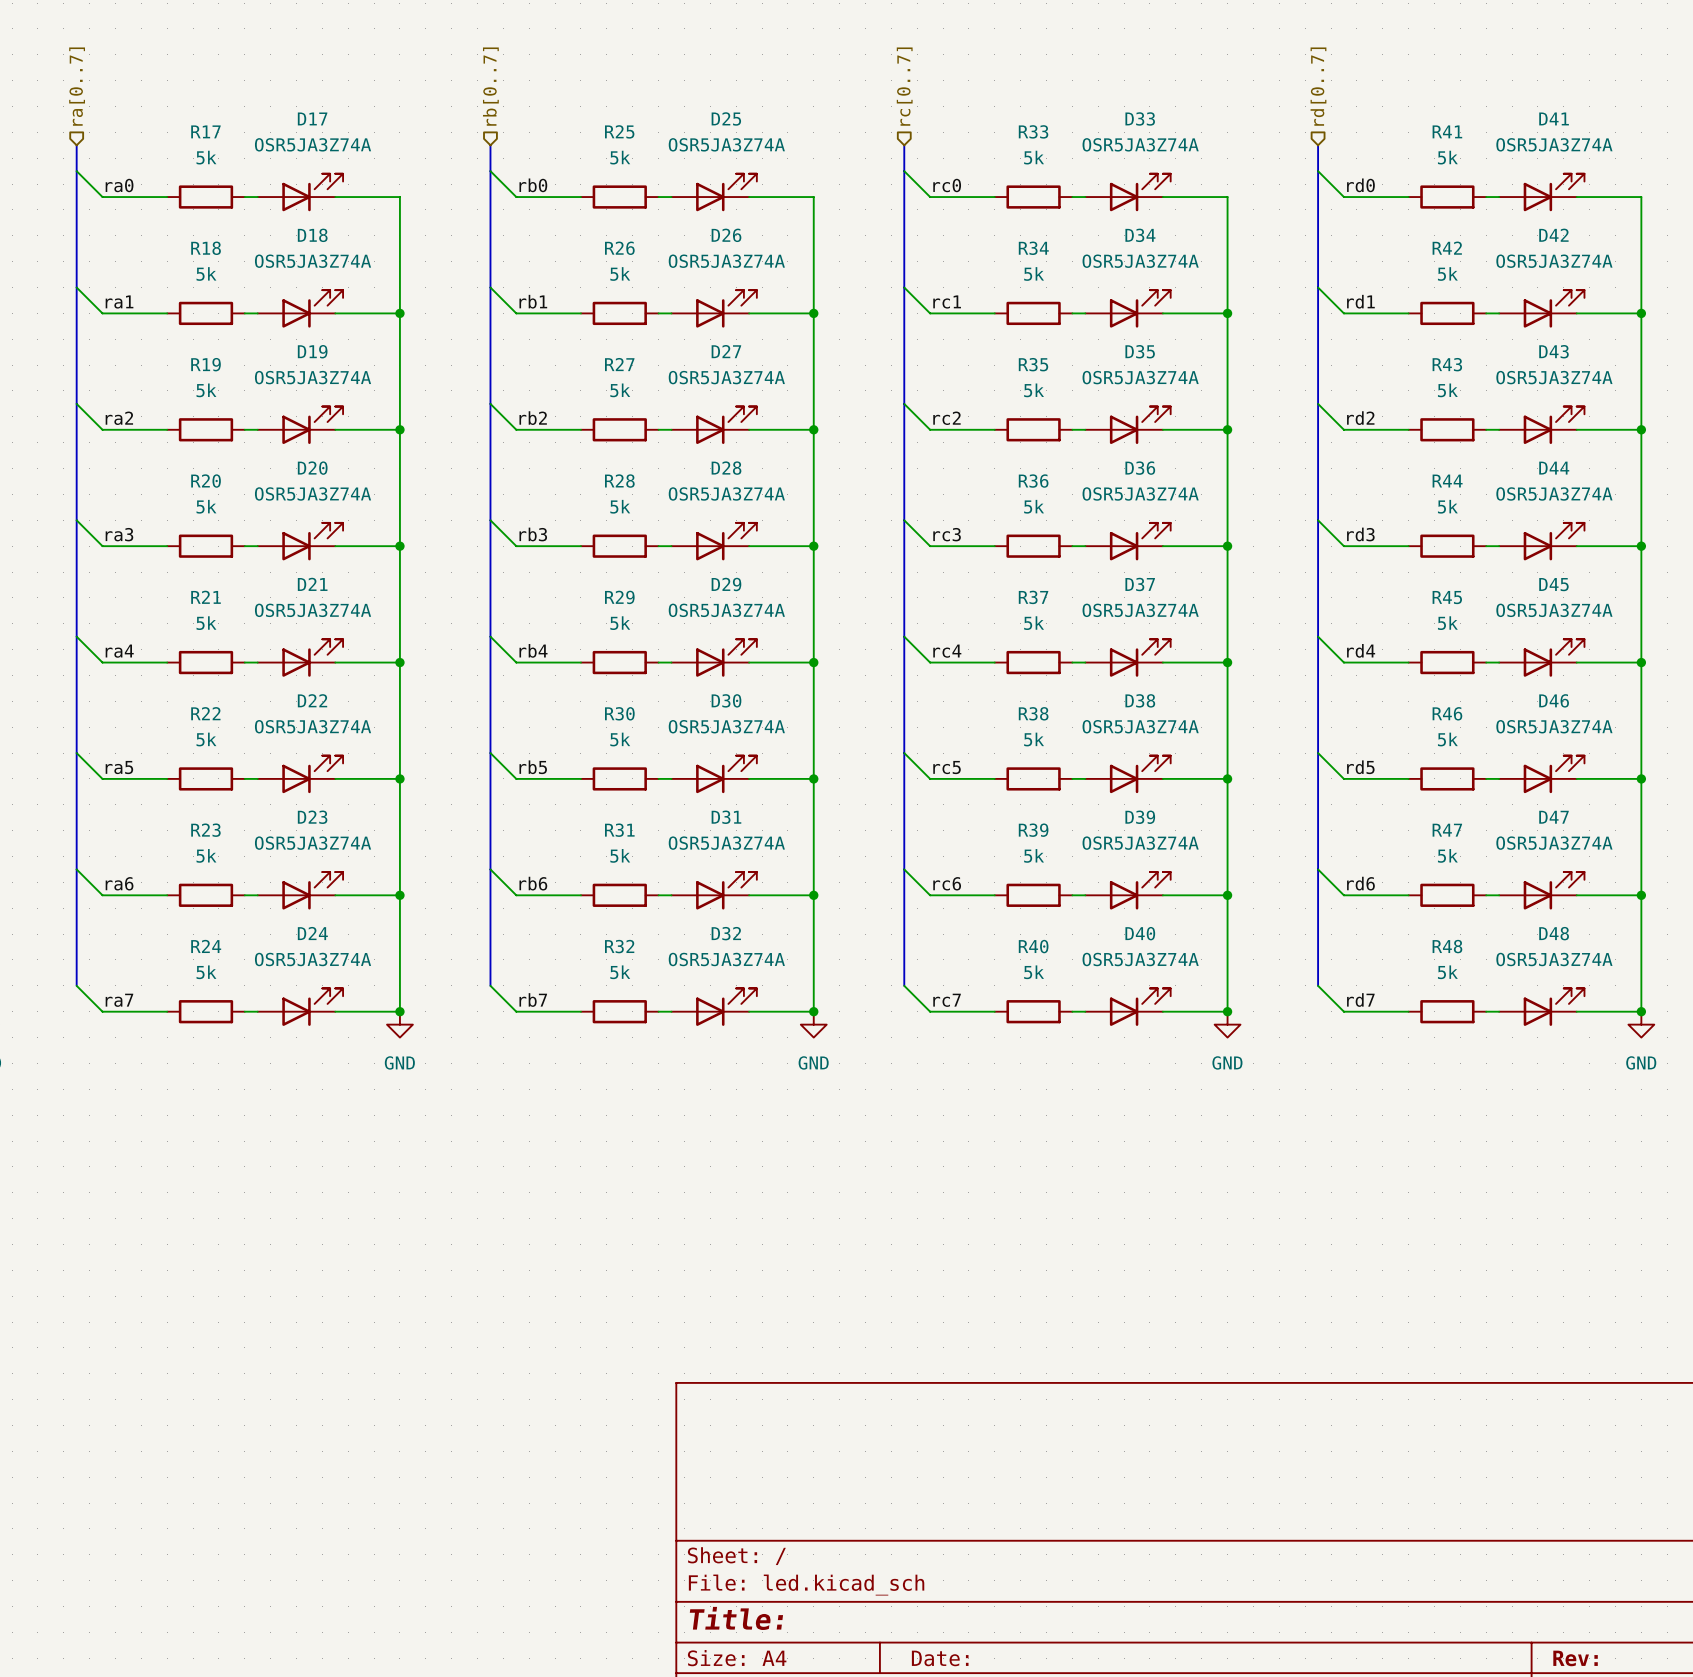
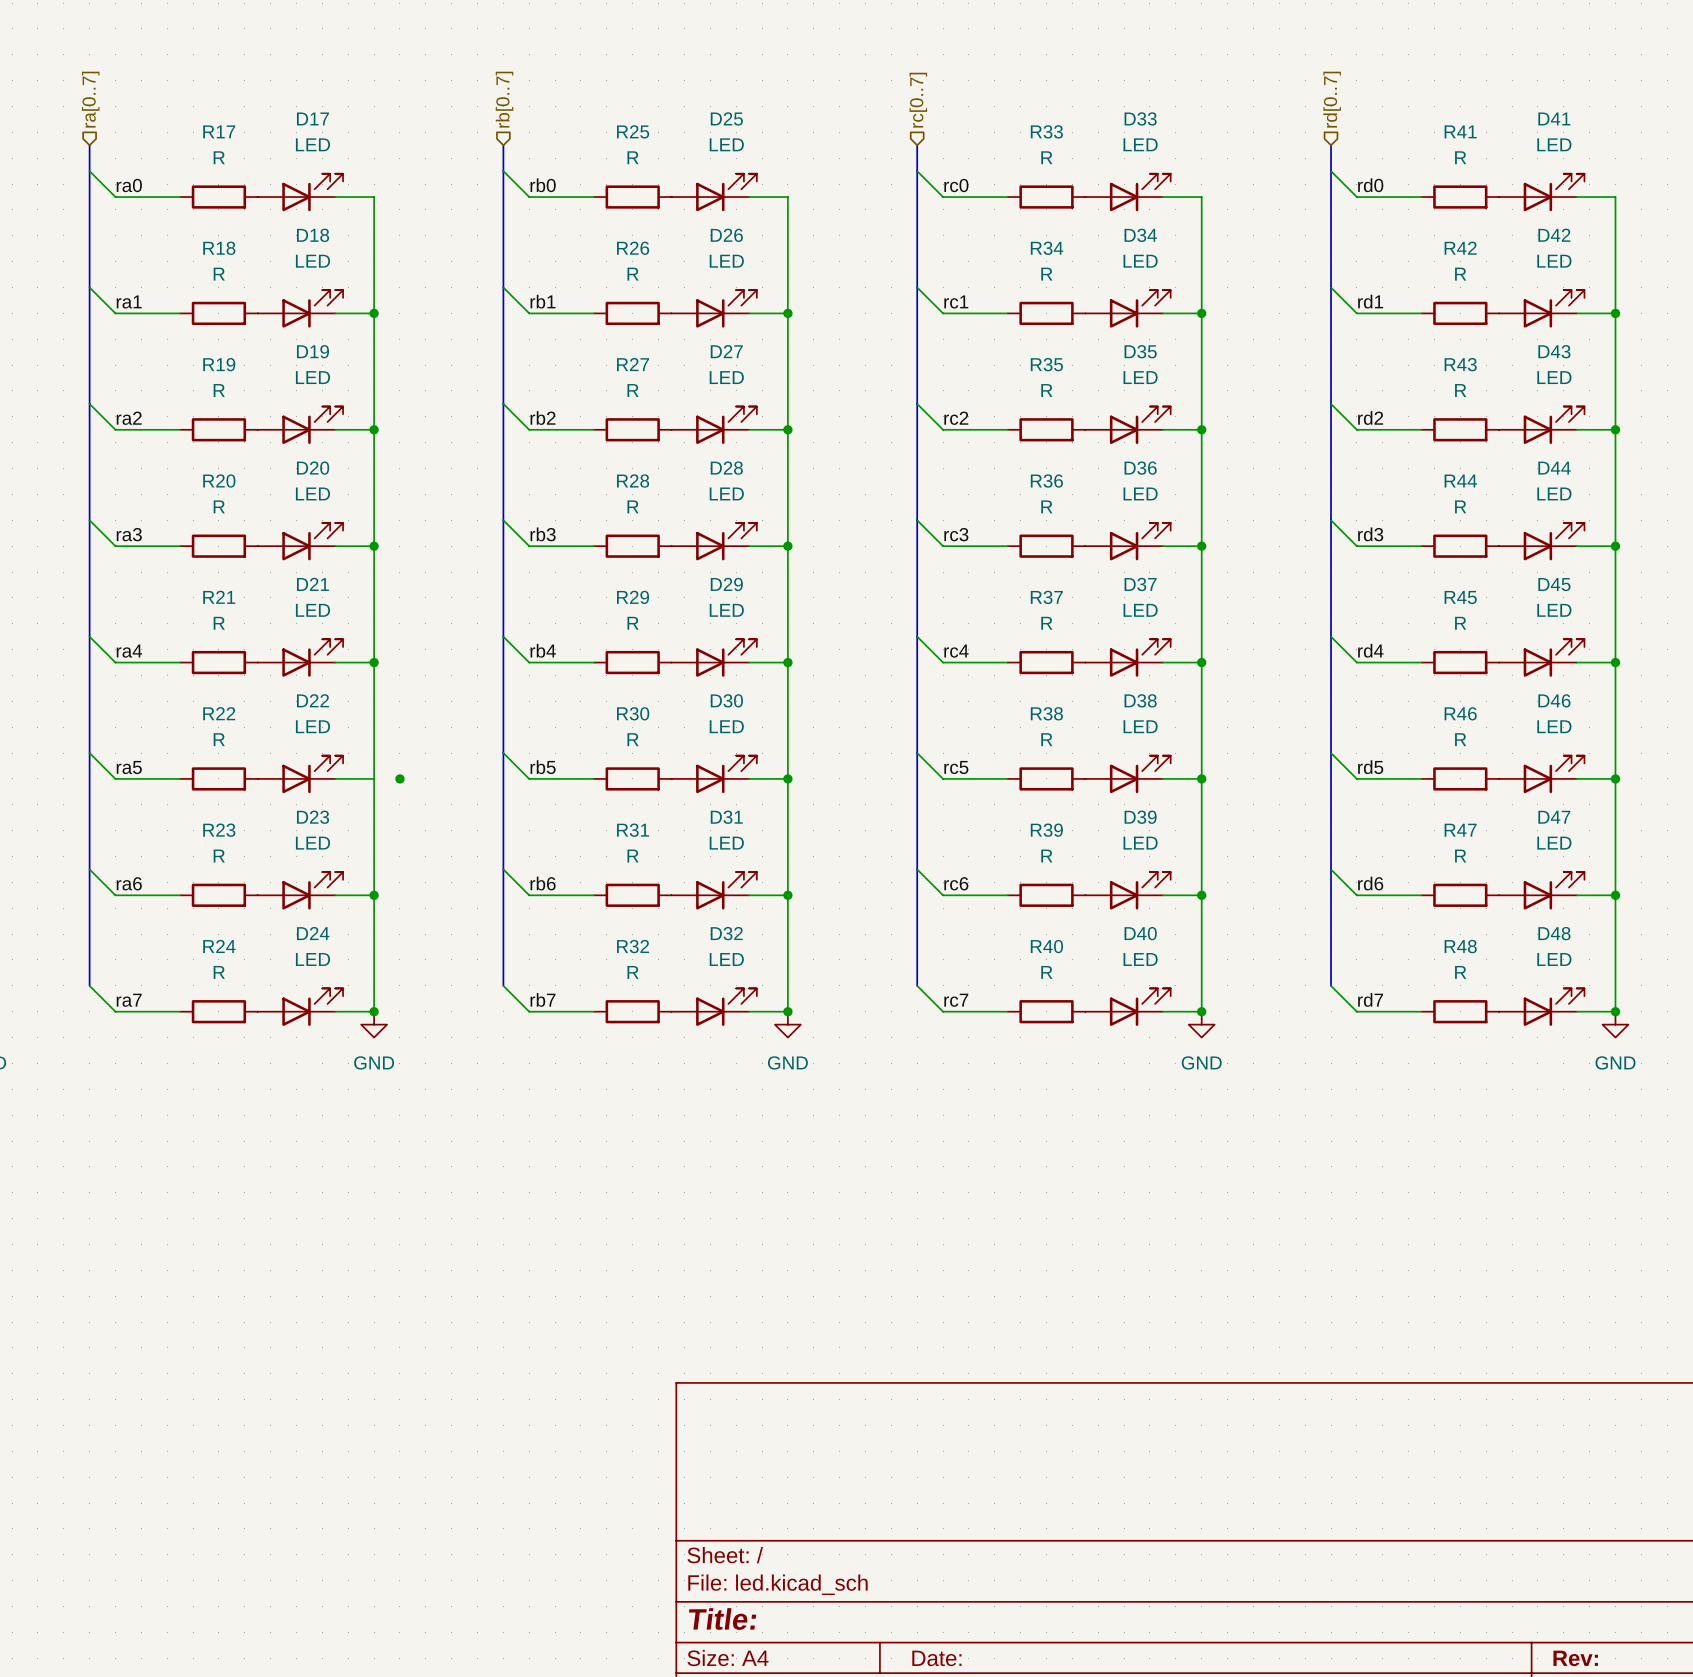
hierarchical label position: ra[0..7] (77, 86) -> ra[0..7] (90, 99)
hierarchical label position: rb[0..7] (490, 86) -> rb[0..7] (504, 99)
hierarchical label position: rc[0..7] (904, 86) -> rc[0..7] (918, 100)
hierarchical label position: rd[0..7] (1318, 86) -> rd[0..7] (1332, 99)
D17 value: OSR5JA3Z74A (313, 144) -> LED (312, 144)
D25 value: OSR5JA3Z74A (726, 144) -> LED (726, 144)
D33 value: OSR5JA3Z74A (1140, 144) -> LED (1140, 144)
D41 value: OSR5JA3Z74A (1554, 144) -> LED (1554, 144)
bus: (76, 145) (76, 985) -> (89, 145) (89, 985)
bus: (490, 145) (490, 985) -> (503, 145) (503, 985)
bus: (904, 145) (904, 985) -> (917, 145) (917, 985)
bus: (1318, 145) (1318, 985) -> (1331, 145) (1331, 985)
R17 value: 5k (206, 157) -> R (219, 157)
R25 value: 5k (620, 157) -> R (633, 157)
R33 value: 5k (1034, 157) -> R (1046, 157)
R41 value: 5k (1447, 157) -> R (1460, 157)
wire: (76, 171) (102, 197) (115, 197) -> (89, 171) (115, 197)
wire: (490, 171) (516, 197) (529, 197) -> (503, 171) (529, 197)
wire: (904, 171) (930, 197) (943, 197) -> (917, 171) (943, 197)
wire: (1318, 171) (1343, 197) (1356, 197) -> (1331, 171) (1356, 197)
label position: ra0 (119, 185) -> ra0 (129, 185)
label position: rb0 (533, 185) -> rb0 (543, 185)
label position: rc0 (947, 185) -> rc0 (956, 185)
label position: rd0 (1360, 185) -> rd0 (1370, 185)
R17 position: (205, 197) -> (218, 197)
wire: (374, 197) (399, 197) (399, 1011) (374, 1011) -> (374, 197) (374, 1011)
R25 position: (619, 197) -> (632, 197)
wire: (787, 197) (813, 197) (813, 1011) (787, 1011) -> (787, 197) (787, 1011)
R33 position: (1033, 197) -> (1046, 197)
wire: (1201, 197) (1227, 197) (1227, 1011) (1201, 1011) -> (1201, 197) (1201, 1011)
R41 position: (1447, 197) -> (1460, 197)
wire: (1615, 197) (1641, 197) (1641, 1011) (1615, 1011) -> (1615, 197) (1615, 1011)
D18 value: OSR5JA3Z74A (313, 261) -> LED (312, 261)
D26 value: OSR5JA3Z74A (726, 261) -> LED (726, 261)
D34 value: OSR5JA3Z74A (1140, 261) -> LED (1140, 261)
D42 value: OSR5JA3Z74A (1554, 261) -> LED (1554, 261)
R18 value: 5k (206, 273) -> R (219, 274)
R26 value: 5k (620, 273) -> R (633, 274)
R34 value: 5k (1034, 273) -> R (1046, 274)
R42 value: 5k (1447, 273) -> R (1460, 274)
wire: (76, 287) (102, 313) (115, 313) -> (89, 287) (115, 313)
wire: (490, 287) (516, 313) (529, 313) -> (503, 287) (529, 313)
wire: (904, 287) (930, 313) (943, 313) -> (917, 287) (943, 313)
wire: (1318, 287) (1343, 313) (1356, 313) -> (1331, 287) (1356, 313)
label position: ra1 (119, 301) -> ra1 (129, 301)
label position: rb1 (533, 301) -> rb1 (543, 301)
label position: rc1 (947, 301) -> rc1 (956, 301)
label position: rd1 (1360, 301) -> rd1 (1370, 301)
R18 position: (205, 313) -> (218, 313)
wire: (374, 313) (399, 313) -> none
junction position: (399, 313) -> (374, 313)
R26 position: (619, 313) -> (632, 313)
wire: (787, 313) (813, 313) -> none
junction position: (813, 313) -> (787, 313)
R34 position: (1033, 313) -> (1046, 313)
wire: (1201, 313) (1227, 313) -> none
junction position: (1227, 313) -> (1201, 313)
R42 position: (1447, 313) -> (1460, 313)
wire: (1615, 313) (1641, 313) -> none
junction position: (1641, 313) -> (1615, 313)
D19 value: OSR5JA3Z74A (313, 377) -> LED (312, 377)
D27 value: OSR5JA3Z74A (726, 377) -> LED (726, 377)
D35 value: OSR5JA3Z74A (1140, 377) -> LED (1140, 377)
D43 value: OSR5JA3Z74A (1554, 377) -> LED (1554, 377)
R19 value: 5k (206, 390) -> R (219, 390)
R27 value: 5k (620, 390) -> R (633, 390)
R35 value: 5k (1034, 390) -> R (1046, 390)
R43 value: 5k (1447, 390) -> R (1460, 390)
wire: (76, 403) (102, 429) (115, 429) -> (89, 403) (115, 429)
wire: (490, 403) (516, 429) (529, 429) -> (503, 403) (529, 429)
wire: (904, 403) (930, 429) (943, 429) -> (917, 403) (943, 429)
wire: (1318, 403) (1343, 429) (1356, 429) -> (1331, 403) (1356, 429)
label position: ra2 (119, 418) -> ra2 (129, 418)
label position: rb2 (533, 418) -> rb2 (543, 418)
label position: rc2 (946, 418) -> rc2 (956, 418)
label position: rd2 (1360, 418) -> rd2 (1370, 418)
R19 position: (205, 429) -> (218, 429)
wire: (374, 429) (399, 429) -> none
junction position: (399, 429) -> (374, 429)
R27 position: (619, 429) -> (632, 429)
wire: (787, 429) (813, 429) -> none
junction position: (813, 429) -> (787, 429)
R35 position: (1033, 429) -> (1046, 429)
wire: (1201, 429) (1227, 429) -> none
junction position: (1227, 429) -> (1201, 429)
R43 position: (1447, 429) -> (1460, 429)
wire: (1615, 429) (1641, 429) -> none
junction position: (1641, 429) -> (1615, 429)
D20 value: OSR5JA3Z74A (313, 493) -> LED (312, 493)
D28 value: OSR5JA3Z74A (726, 493) -> LED (726, 493)
D36 value: OSR5JA3Z74A (1140, 493) -> LED (1140, 493)
D44 value: OSR5JA3Z74A (1554, 493) -> LED (1554, 493)
R20 value: 5k (206, 506) -> R (219, 506)
R28 value: 5k (620, 506) -> R (633, 506)
R36 value: 5k (1034, 506) -> R (1046, 506)
R44 value: 5k (1447, 506) -> R (1460, 506)
wire: (76, 520) (102, 546) (115, 546) -> (89, 520) (115, 546)
wire: (490, 520) (516, 546) (529, 546) -> (503, 520) (529, 546)
wire: (904, 520) (930, 546) (943, 546) -> (917, 520) (943, 546)
wire: (1318, 520) (1343, 546) (1356, 546) -> (1331, 520) (1356, 546)
label position: ra3 (119, 534) -> ra3 (129, 534)
label position: rb3 (533, 534) -> rb3 (543, 534)
label position: rc3 (947, 534) -> rc3 (956, 534)
label position: rd3 (1360, 534) -> rd3 (1370, 534)
R20 position: (205, 546) -> (218, 546)
wire: (374, 546) (399, 546) -> none
junction position: (399, 546) -> (374, 546)
R28 position: (619, 546) -> (632, 546)
wire: (787, 546) (813, 546) -> none
junction position: (813, 546) -> (787, 546)
R36 position: (1033, 546) -> (1046, 546)
wire: (1201, 546) (1227, 546) -> none
junction position: (1227, 546) -> (1201, 546)
R44 position: (1447, 546) -> (1460, 546)
wire: (1615, 546) (1641, 546) -> none
junction position: (1641, 546) -> (1615, 546)
D21 value: OSR5JA3Z74A (313, 610) -> LED (312, 610)
D29 value: OSR5JA3Z74A (726, 610) -> LED (726, 610)
D37 value: OSR5JA3Z74A (1140, 610) -> LED (1140, 610)
D45 value: OSR5JA3Z74A (1554, 610) -> LED (1554, 610)
R21 value: 5k (206, 623) -> R (219, 623)
R29 value: 5k (620, 623) -> R (633, 623)
R37 value: 5k (1034, 623) -> R (1046, 623)
R45 value: 5k (1447, 623) -> R (1460, 623)
wire: (76, 636) (102, 662) (115, 662) -> (89, 636) (115, 662)
wire: (490, 636) (516, 662) (529, 662) -> (503, 636) (529, 662)
wire: (904, 636) (930, 662) (943, 662) -> (917, 636) (943, 662)
wire: (1318, 636) (1343, 662) (1356, 662) -> (1331, 636) (1356, 662)
label position: rb4 (533, 650) -> rb4 (543, 650)
label position: rd4 (1361, 650) -> rd4 (1370, 650)
label position: ra4 (119, 651) -> ra4 (129, 651)
label position: rc4 (947, 651) -> rc4 (956, 651)
R21 position: (205, 662) -> (218, 662)
wire: (374, 662) (399, 662) -> none
junction position: (399, 662) -> (374, 662)
R29 position: (619, 662) -> (632, 662)
wire: (787, 662) (813, 662) -> none
junction position: (813, 662) -> (787, 662)
R37 position: (1033, 662) -> (1046, 662)
wire: (1201, 662) (1227, 662) -> none
junction position: (1227, 662) -> (1201, 662)
R45 position: (1447, 662) -> (1460, 662)
wire: (1615, 662) (1641, 662) -> none
junction position: (1641, 662) -> (1615, 662)
D22 value: OSR5JA3Z74A (313, 726) -> LED (312, 726)
D30 value: OSR5JA3Z74A (726, 726) -> LED (726, 726)
D38 value: OSR5JA3Z74A (1140, 726) -> LED (1140, 726)
D46 value: OSR5JA3Z74A (1554, 726) -> LED (1554, 726)
R22 value: 5k (206, 739) -> R (219, 739)
R30 value: 5k (620, 739) -> R (633, 739)
R38 value: 5k (1034, 739) -> R (1046, 739)
R46 value: 5k (1447, 739) -> R (1460, 739)
wire: (76, 753) (102, 778) (115, 778) -> (89, 753) (115, 778)
wire: (490, 753) (516, 778) (529, 778) -> (503, 753) (529, 778)
wire: (904, 753) (930, 778) (943, 778) -> (917, 753) (943, 778)
wire: (1318, 753) (1343, 778) (1356, 778) -> (1331, 753) (1356, 778)
label position: ra5 (119, 767) -> ra5 (129, 767)
label position: rb5 (533, 767) -> rb5 (543, 767)
label position: rc5 (947, 767) -> rc5 (956, 767)
label position: rd5 (1360, 767) -> rd5 (1370, 767)
R22 position: (205, 778) -> (218, 778)
wire: (374, 778) (399, 778) -> none
R30 position: (619, 778) -> (632, 778)
wire: (787, 778) (813, 778) -> none
junction position: (813, 778) -> (787, 778)
R38 position: (1033, 778) -> (1046, 778)
wire: (1201, 778) (1227, 778) -> none
junction position: (1227, 778) -> (1201, 778)
R46 position: (1447, 778) -> (1460, 778)
wire: (1615, 778) (1641, 778) -> none
junction position: (1641, 778) -> (1615, 778)
D23 value: OSR5JA3Z74A (313, 843) -> LED (312, 843)
D31 value: OSR5JA3Z74A (726, 843) -> LED (726, 843)
D39 value: OSR5JA3Z74A (1140, 843) -> LED (1140, 843)
D47 value: OSR5JA3Z74A (1554, 843) -> LED (1554, 843)
R23 value: 5k (206, 855) -> R (219, 856)
R31 value: 5k (620, 855) -> R (633, 856)
R39 value: 5k (1034, 855) -> R (1046, 856)
R47 value: 5k (1447, 855) -> R (1460, 856)
wire: (76, 869) (102, 895) (115, 895) -> (89, 869) (115, 895)
wire: (490, 869) (516, 895) (529, 895) -> (503, 869) (529, 895)
wire: (904, 869) (930, 895) (943, 895) -> (917, 869) (943, 895)
wire: (1318, 869) (1343, 895) (1356, 895) -> (1331, 869) (1356, 895)
label position: ra6 (119, 883) -> ra6 (129, 883)
label position: rb6 (533, 883) -> rb6 (543, 883)
label position: rc6 (947, 883) -> rc6 (956, 883)
label position: rd6 (1360, 883) -> rd6 (1370, 883)
R23 position: (205, 895) -> (218, 895)
wire: (374, 895) (399, 895) -> none
junction position: (399, 895) -> (374, 895)
R31 position: (619, 895) -> (632, 895)
wire: (787, 895) (813, 895) -> none
junction position: (813, 895) -> (787, 895)
R39 position: (1033, 895) -> (1046, 895)
wire: (1201, 895) (1227, 895) -> none
junction position: (1227, 895) -> (1201, 895)
R47 position: (1447, 895) -> (1460, 895)
wire: (1615, 895) (1641, 895) -> none
junction position: (1641, 895) -> (1615, 895)
D24 value: OSR5JA3Z74A (313, 959) -> LED (312, 959)
D32 value: OSR5JA3Z74A (726, 959) -> LED (726, 959)
D40 value: OSR5JA3Z74A (1140, 959) -> LED (1140, 959)
D48 value: OSR5JA3Z74A (1554, 959) -> LED (1554, 959)
R24 value: 5k (206, 972) -> R (219, 972)
R32 value: 5k (620, 972) -> R (633, 972)
R40 value: 5k (1034, 972) -> R (1046, 972)
R48 value: 5k (1447, 972) -> R (1460, 972)
wire: (76, 985) (102, 1011) (115, 1011) -> (89, 985) (115, 1011)
wire: (490, 985) (516, 1011) (529, 1011) -> (503, 985) (529, 1011)
wire: (904, 985) (930, 1011) (943, 1011) -> (917, 985) (943, 1011)
wire: (1318, 985) (1343, 1011) (1356, 1011) -> (1331, 985) (1356, 1011)
label position: ra7 (119, 1000) -> ra7 (129, 1000)
label position: rb7 (533, 1000) -> rb7 (543, 999)
label position: rc7 (947, 1000) -> rc7 (956, 1000)
label position: rd7 (1360, 1000) -> rd7 (1370, 999)
R24 position: (205, 1011) -> (218, 1011)
junction position: (399, 1011) -> (374, 1011)
R32 position: (619, 1011) -> (632, 1011)
junction position: (813, 1011) -> (787, 1011)
R40 position: (1033, 1011) -> (1046, 1011)
junction position: (1227, 1011) -> (1201, 1011)
R48 position: (1447, 1011) -> (1460, 1011)
junction position: (1641, 1011) -> (1615, 1011)
power symbol position: GND (399, 1024) -> GND (374, 1024)
power symbol position: GND (813, 1024) -> GND (787, 1024)
power symbol position: GND (1227, 1024) -> GND (1201, 1024)
power symbol position: GND (1641, 1024) -> GND (1615, 1024)

